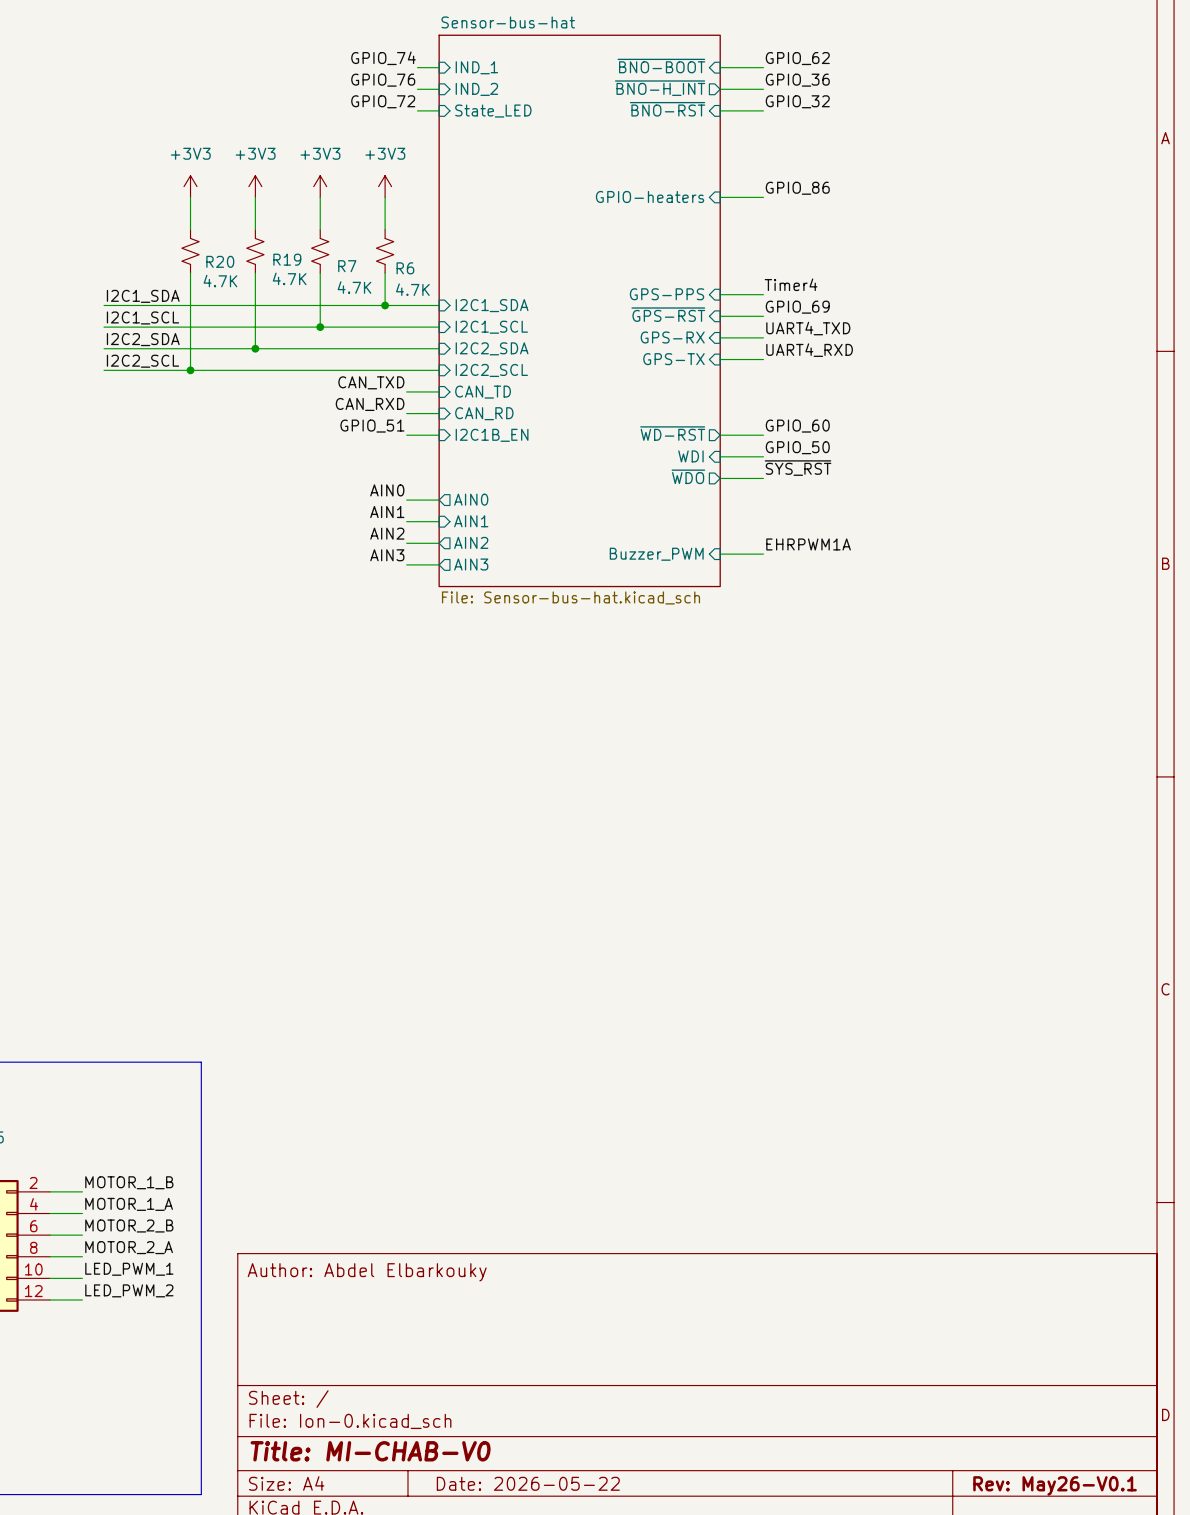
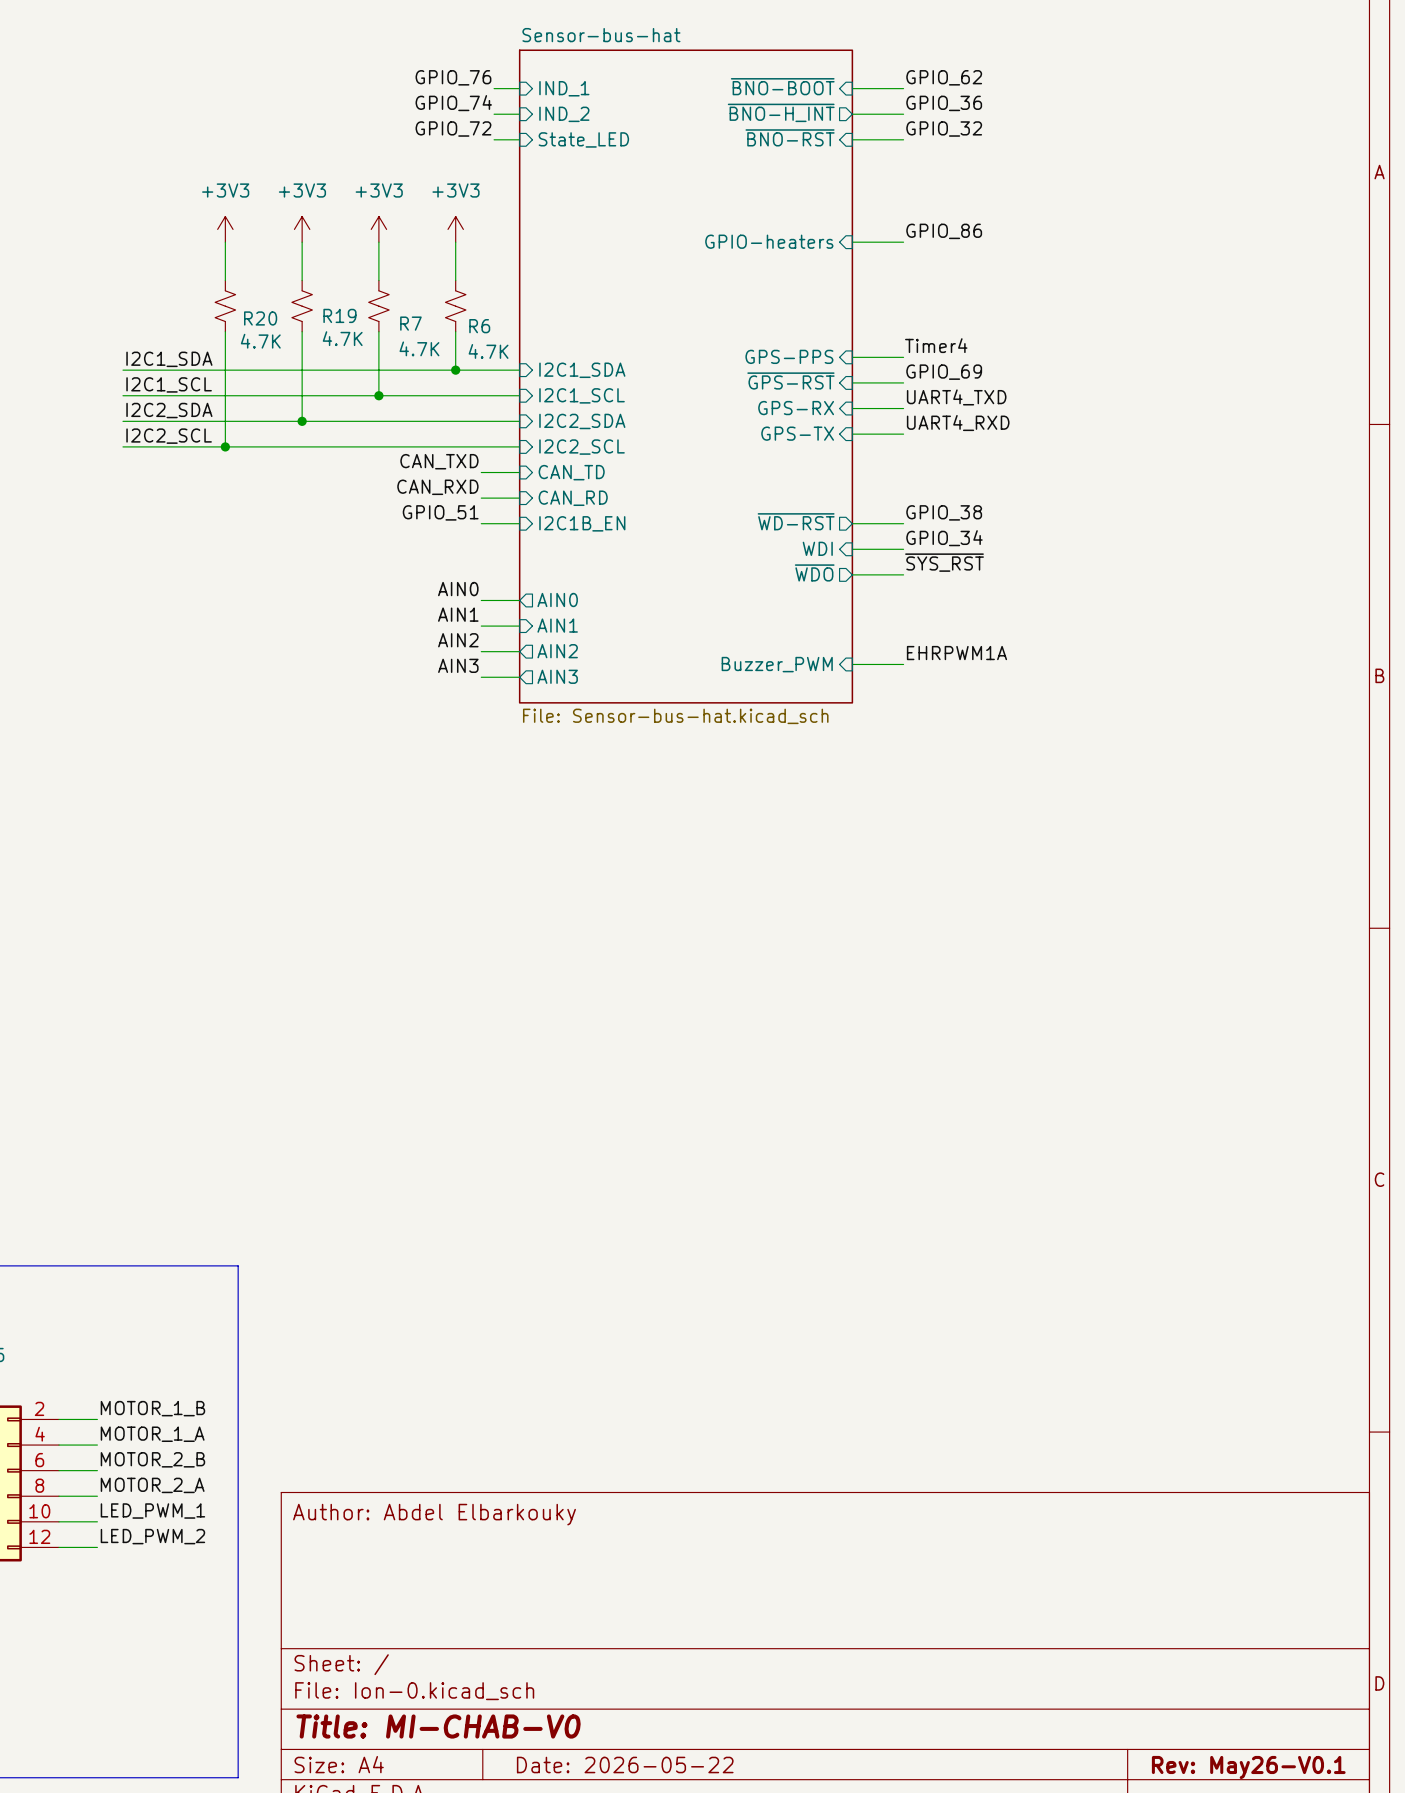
label: GPIO_74 (383, 58) -> GPIO_76 (453, 77)
label: GPIO_76 (383, 80) -> GPIO_74 (453, 103)
label: GPIO_60 (797, 426) -> GPIO_38 (944, 512)
label: GPIO_50 (797, 447) -> GPIO_34 (944, 538)

